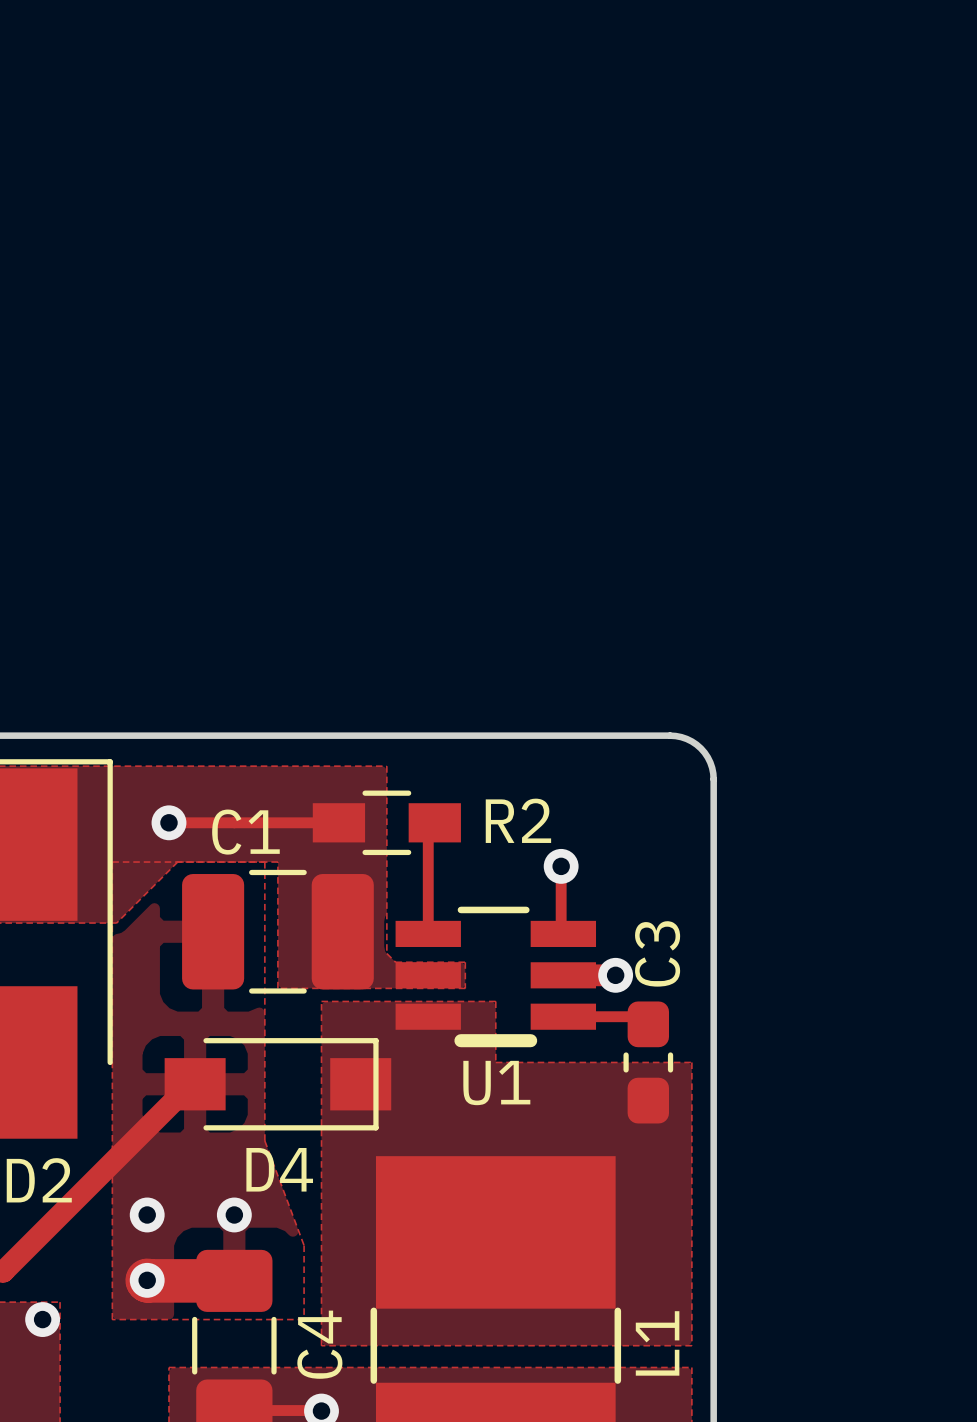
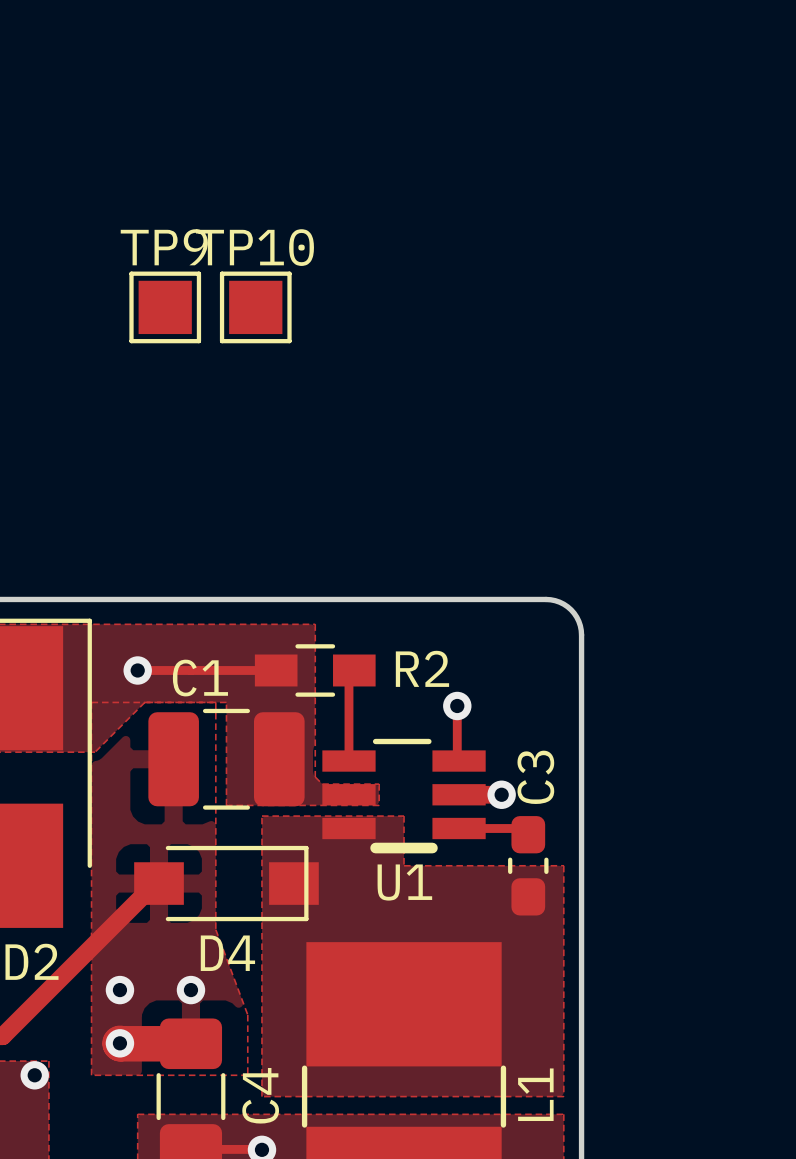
TP9: none -> (165, 307)
TP10: none -> (255, 307)

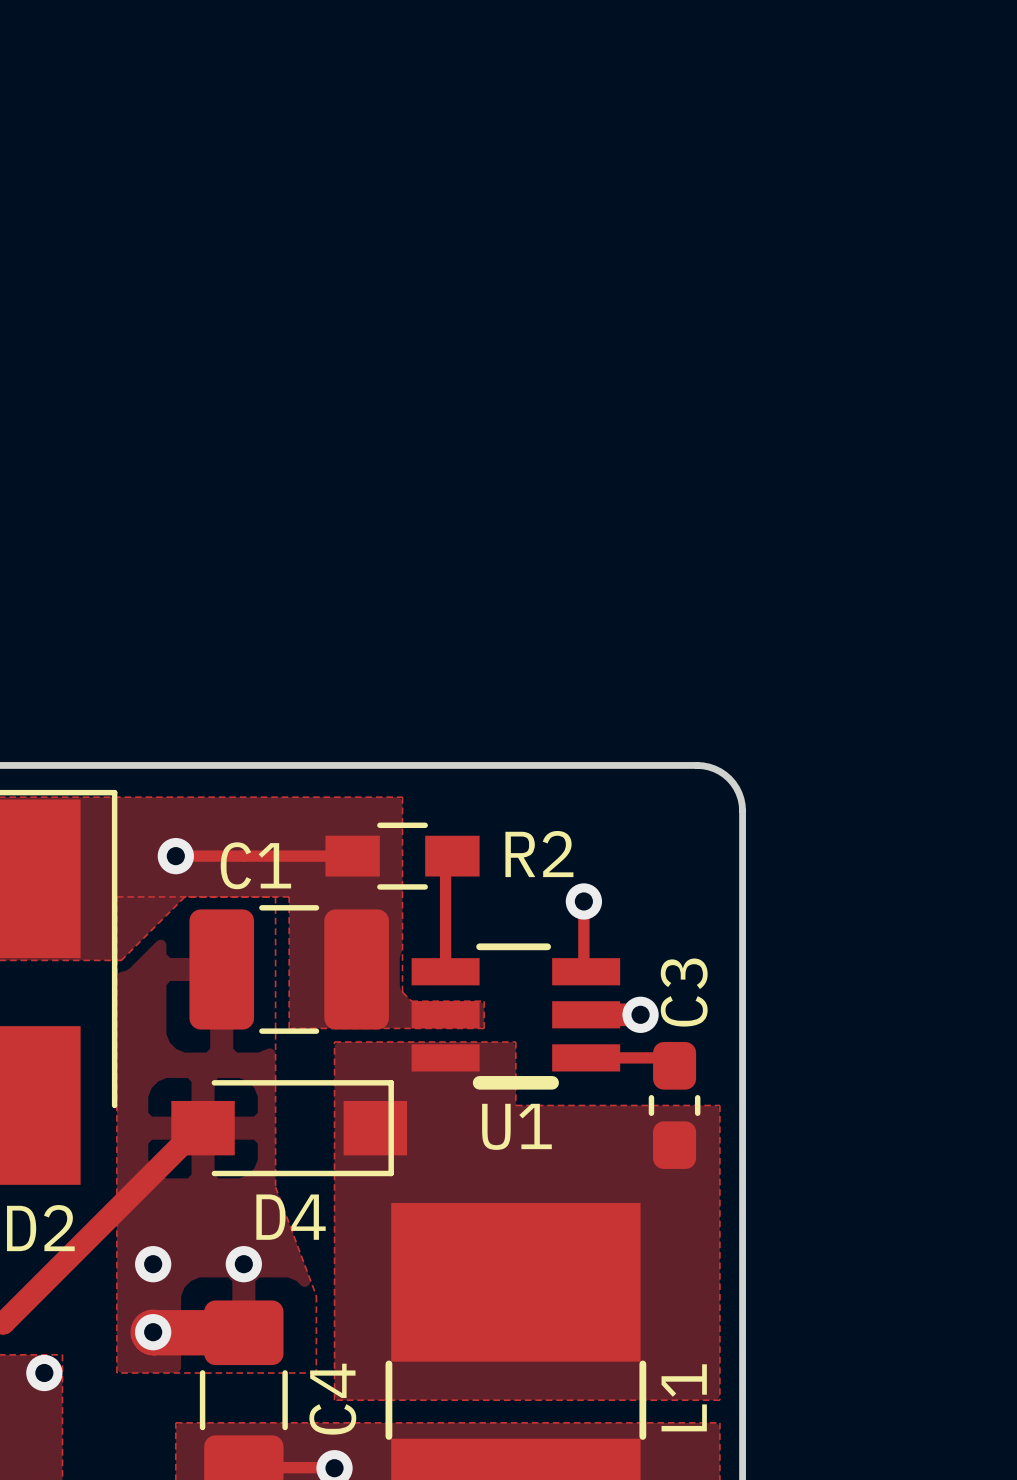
TP9: (165, 307) -> none
TP10: (255, 307) -> none

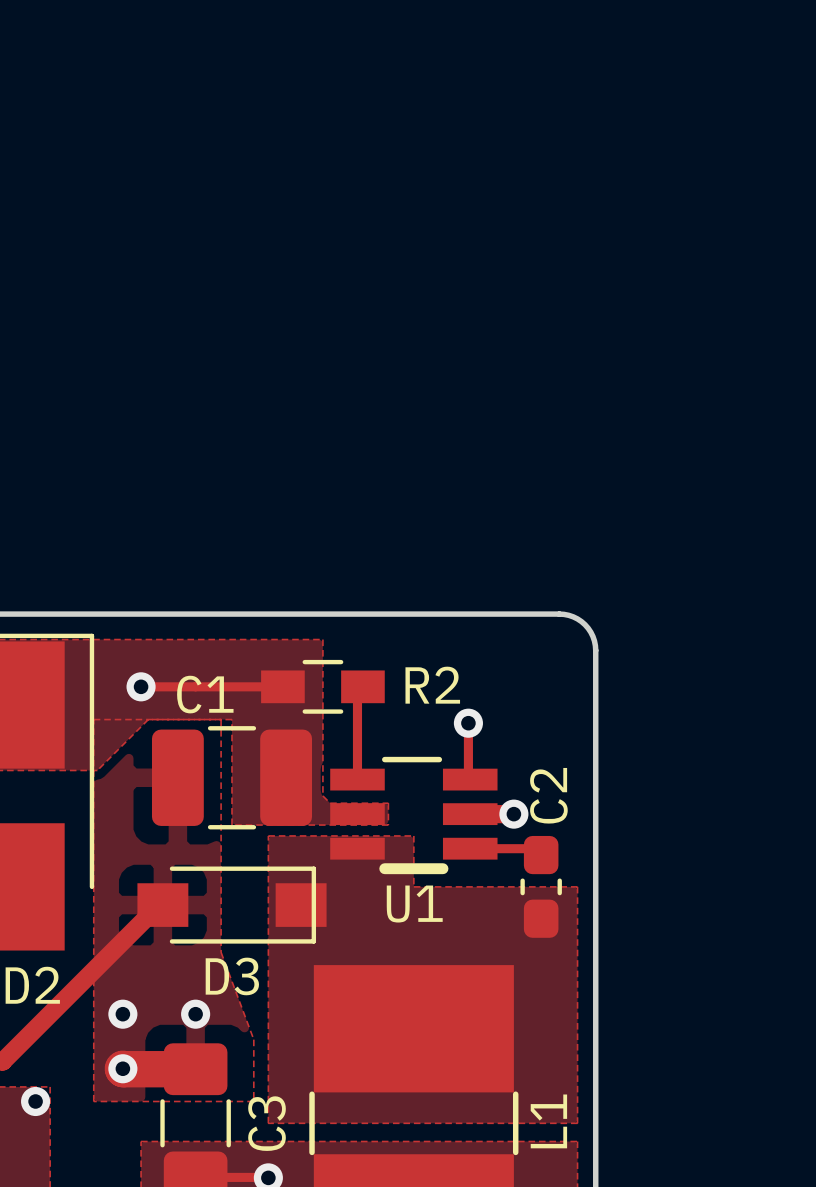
C3 name: C3 (684, 992) -> C2 (548, 795)
D4 name: D4 (291, 1217) -> D3 (232, 976)
C4 name: C4 (332, 1399) -> C3 (267, 1123)

